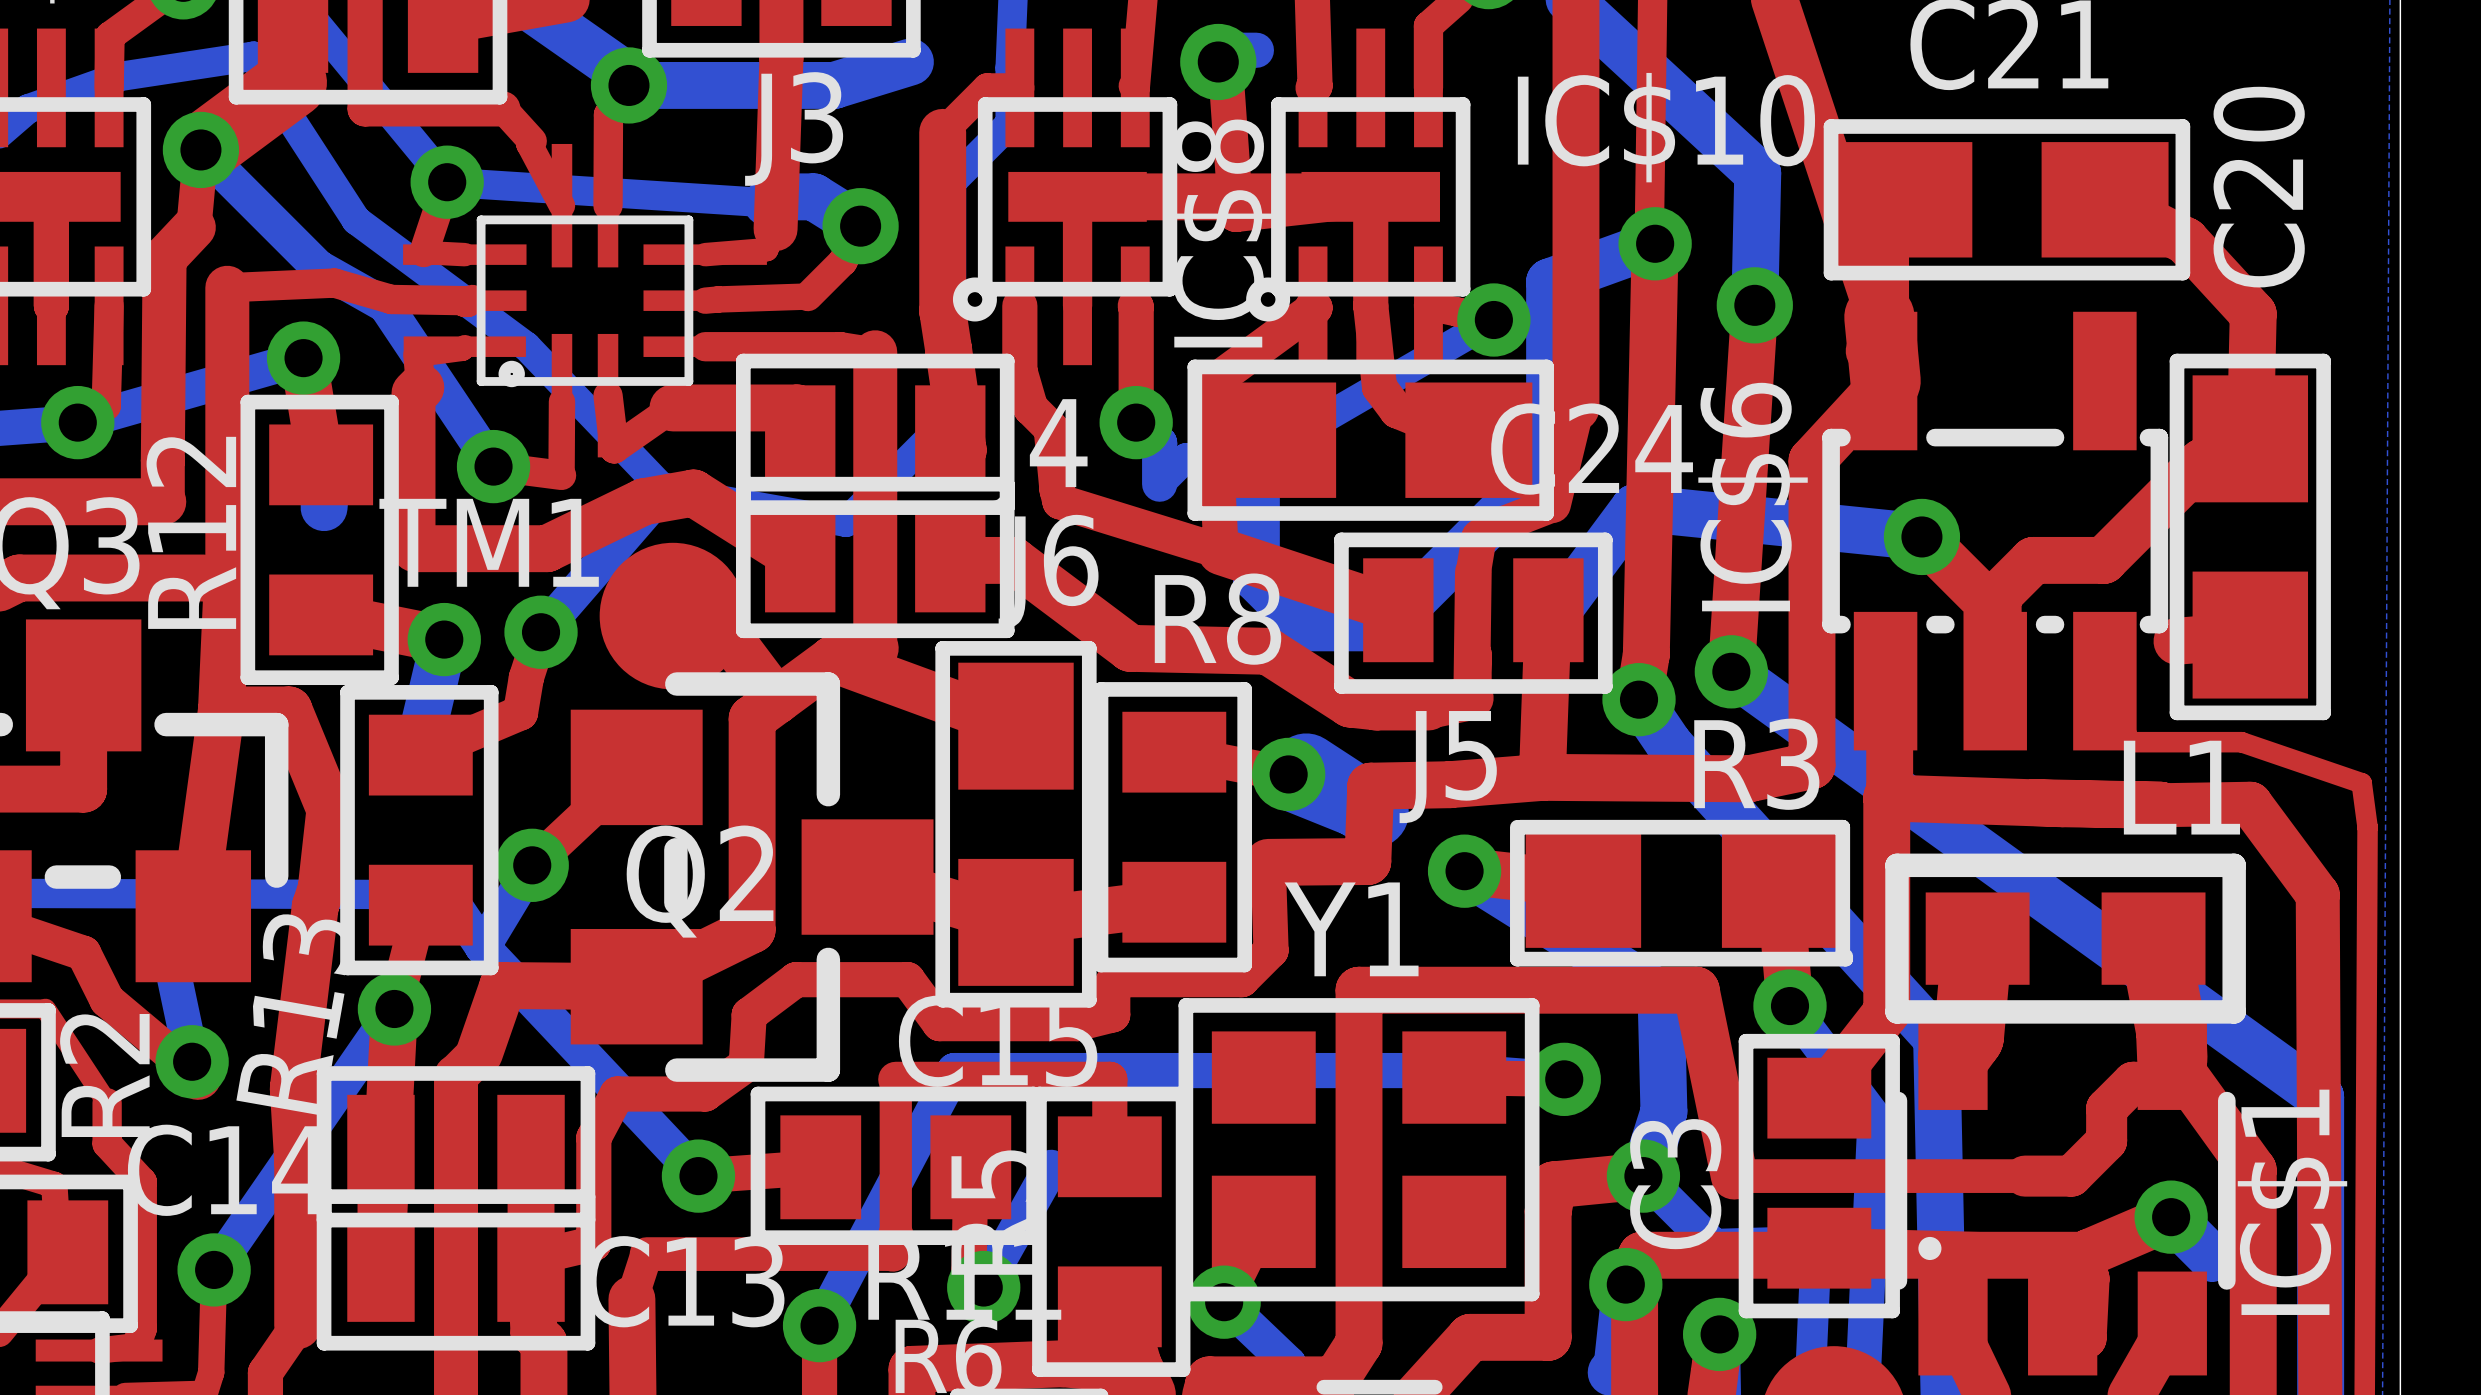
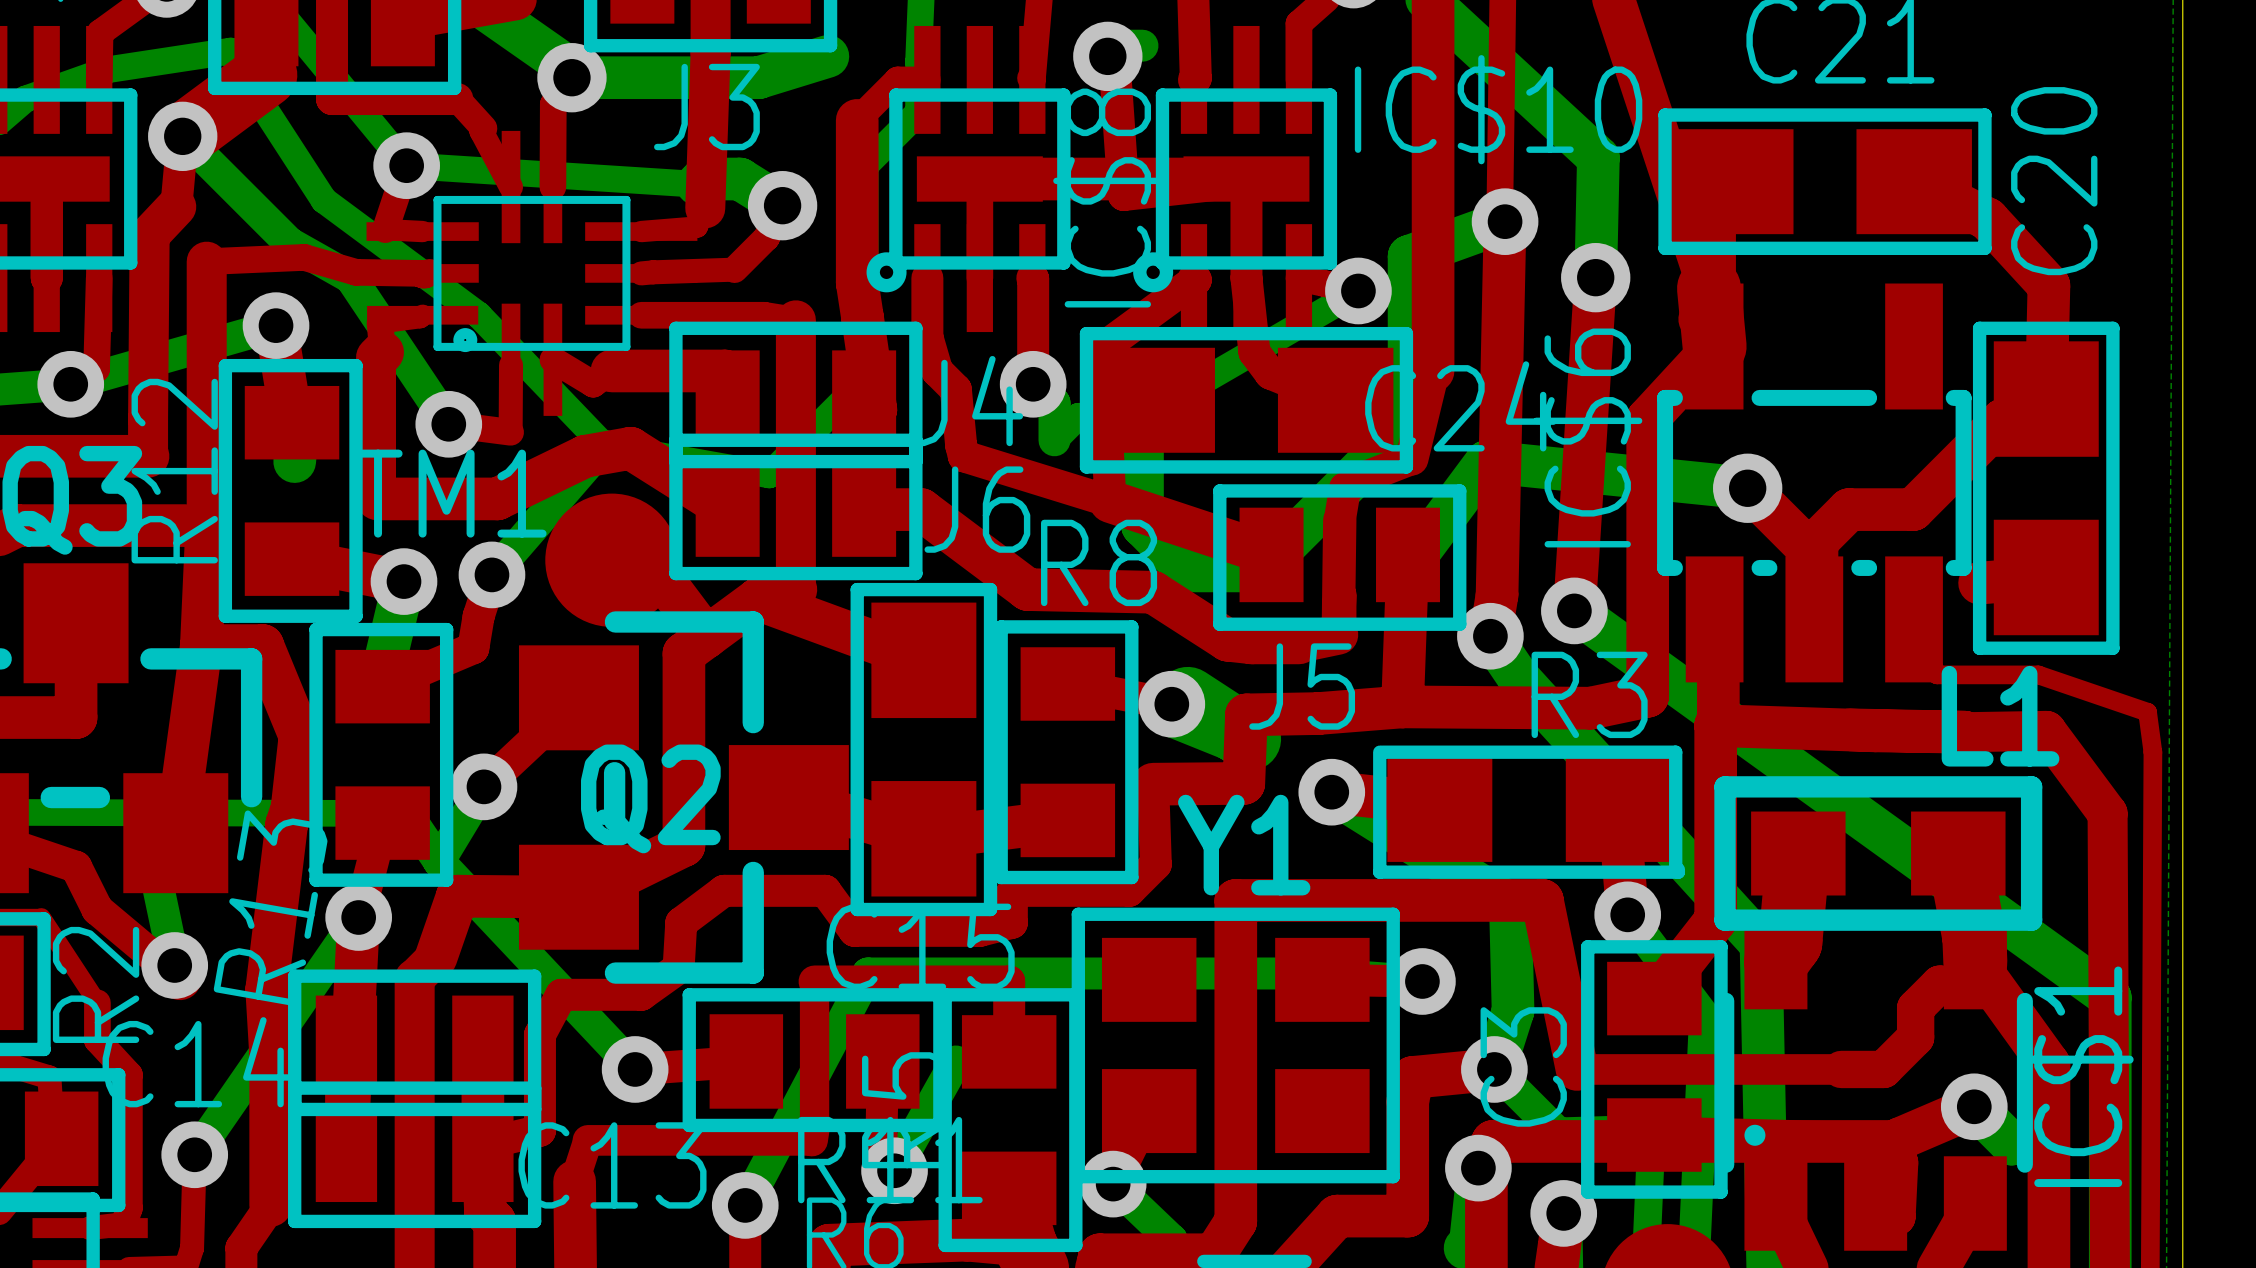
top track: (608, 395) (614, 448) (672, 407) -> (552, 359) (593, 384) (611, 370)

